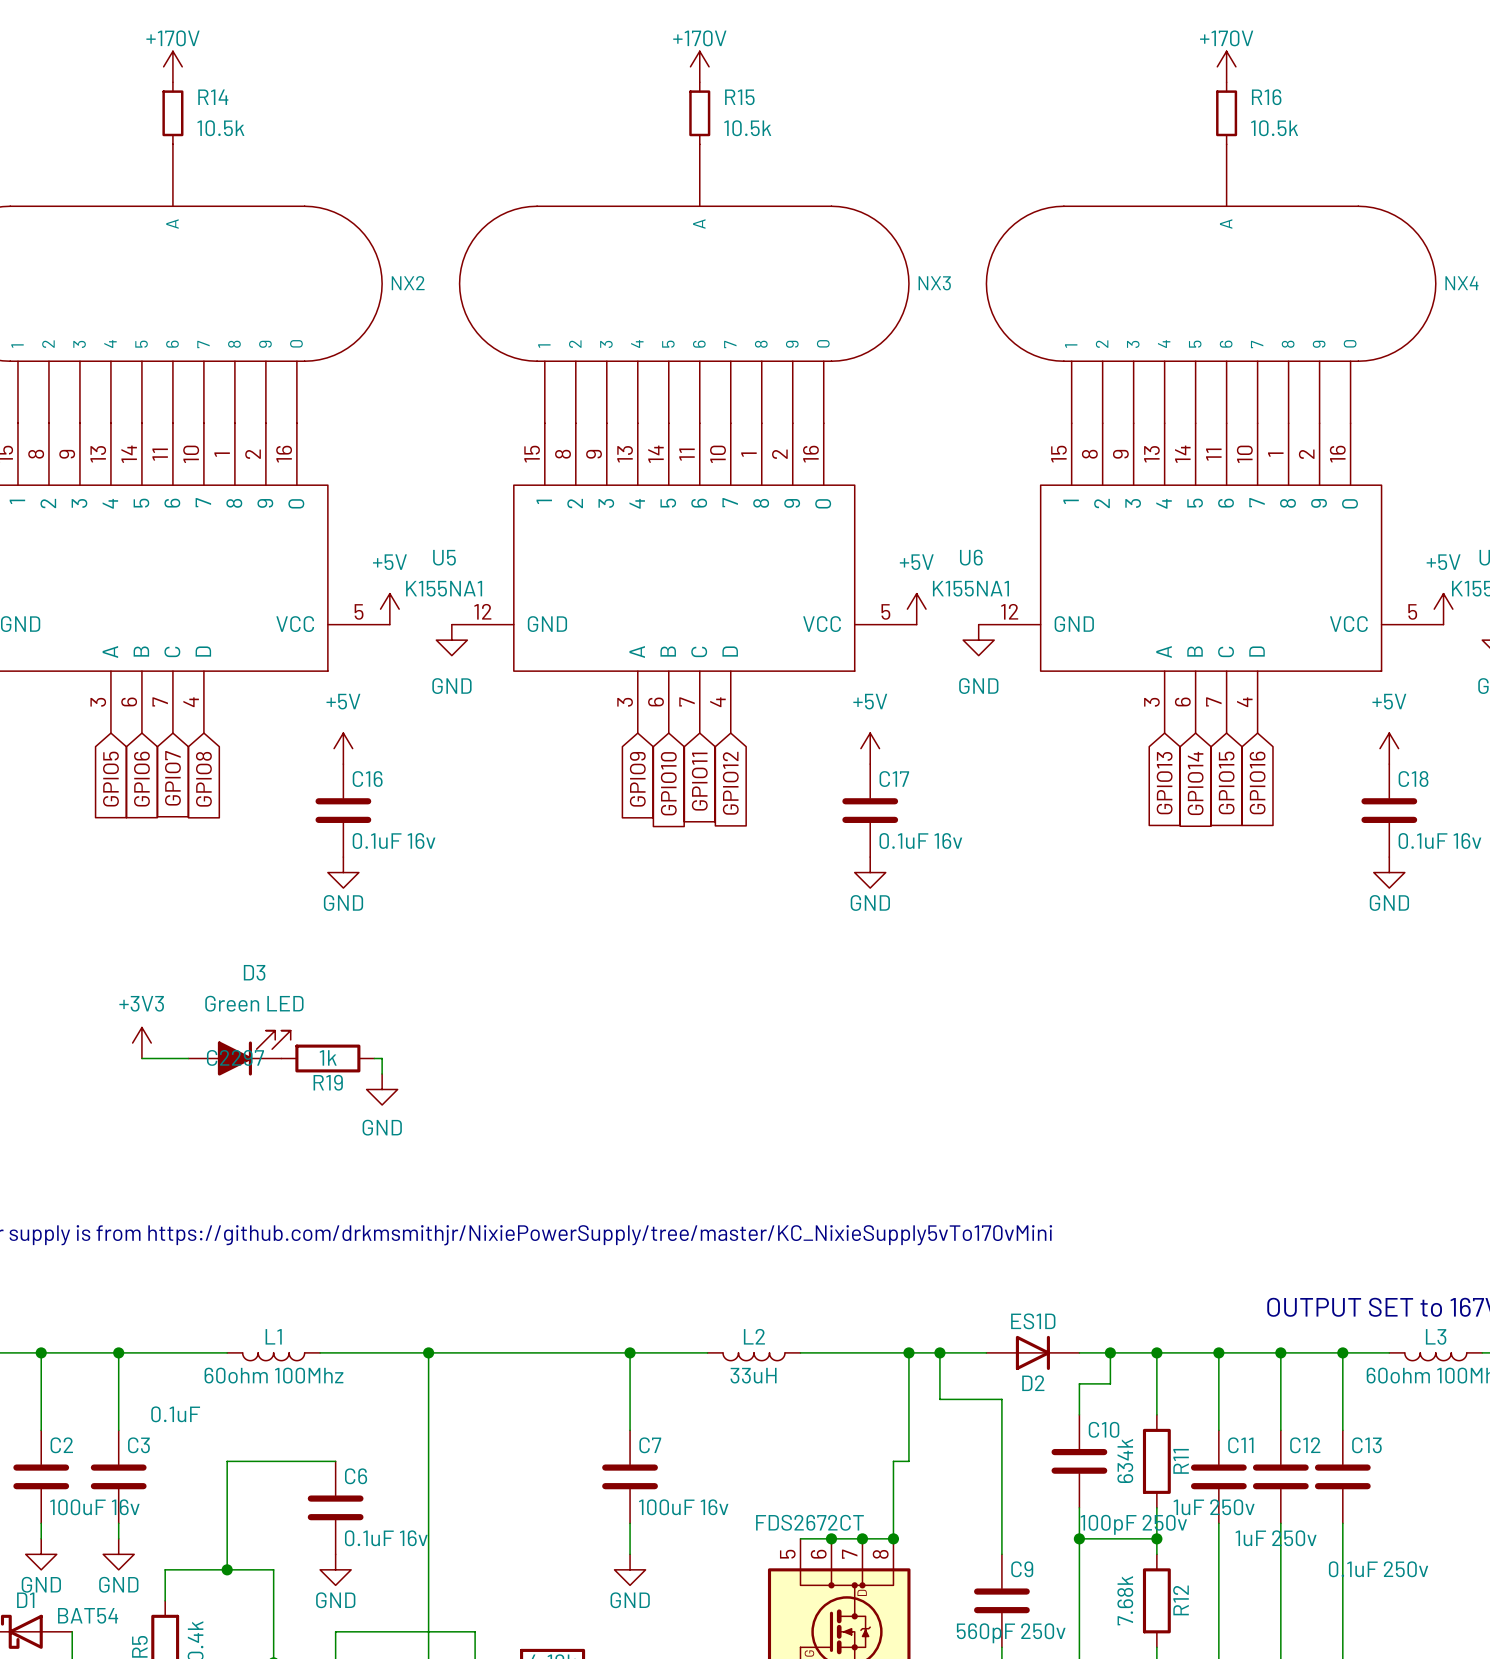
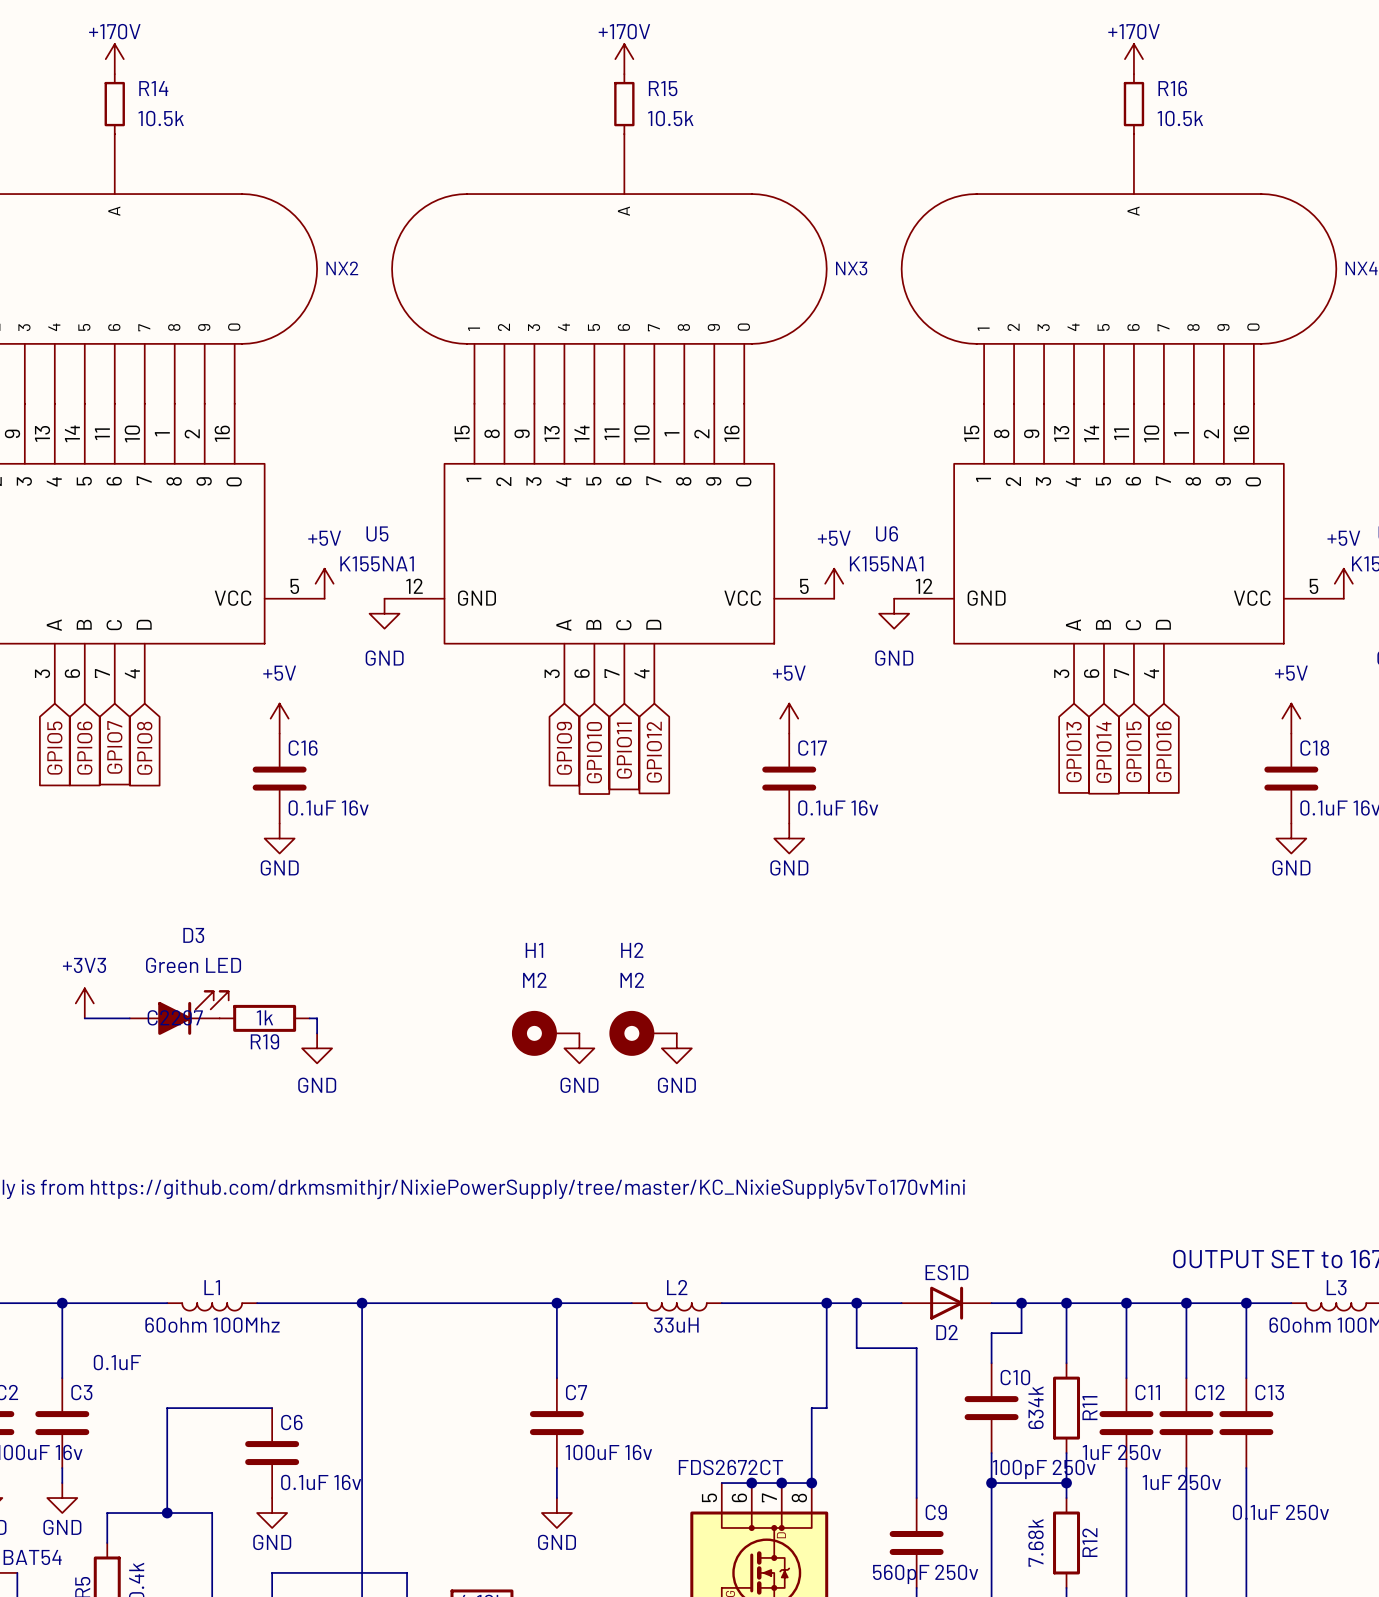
H1: none -> M2 (545, 1033)
H2: none -> M2 (643, 1033)
power symbol: none -> GND (579, 1048)
power symbol: none -> GND (676, 1048)

